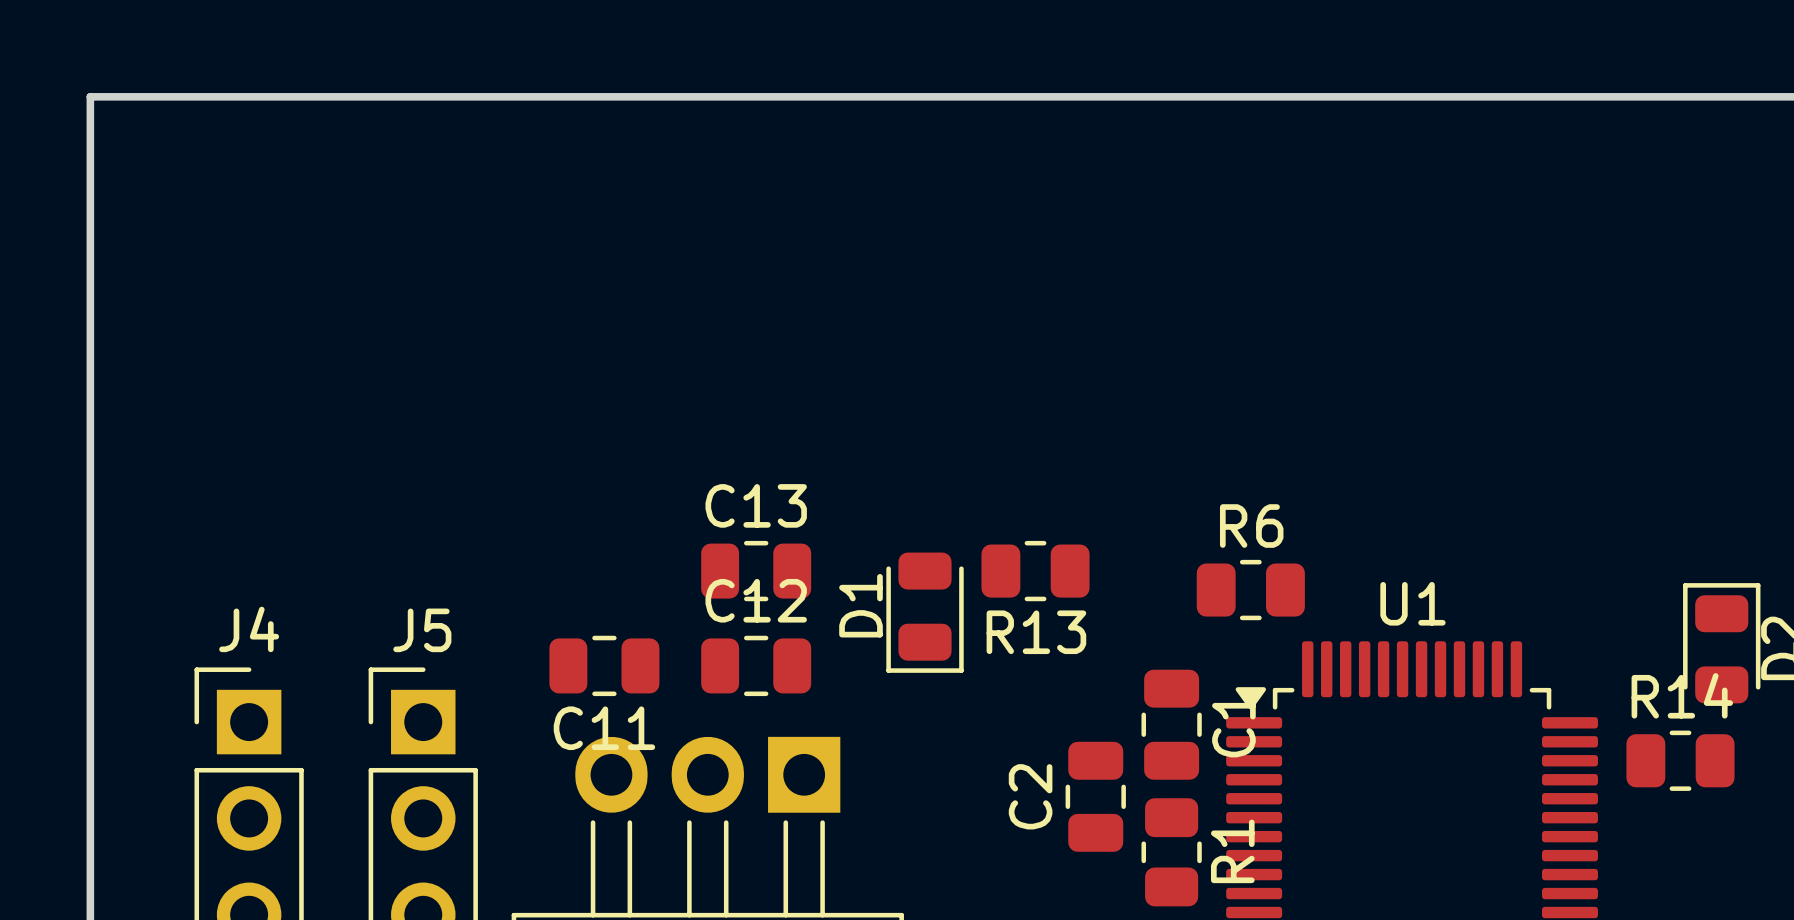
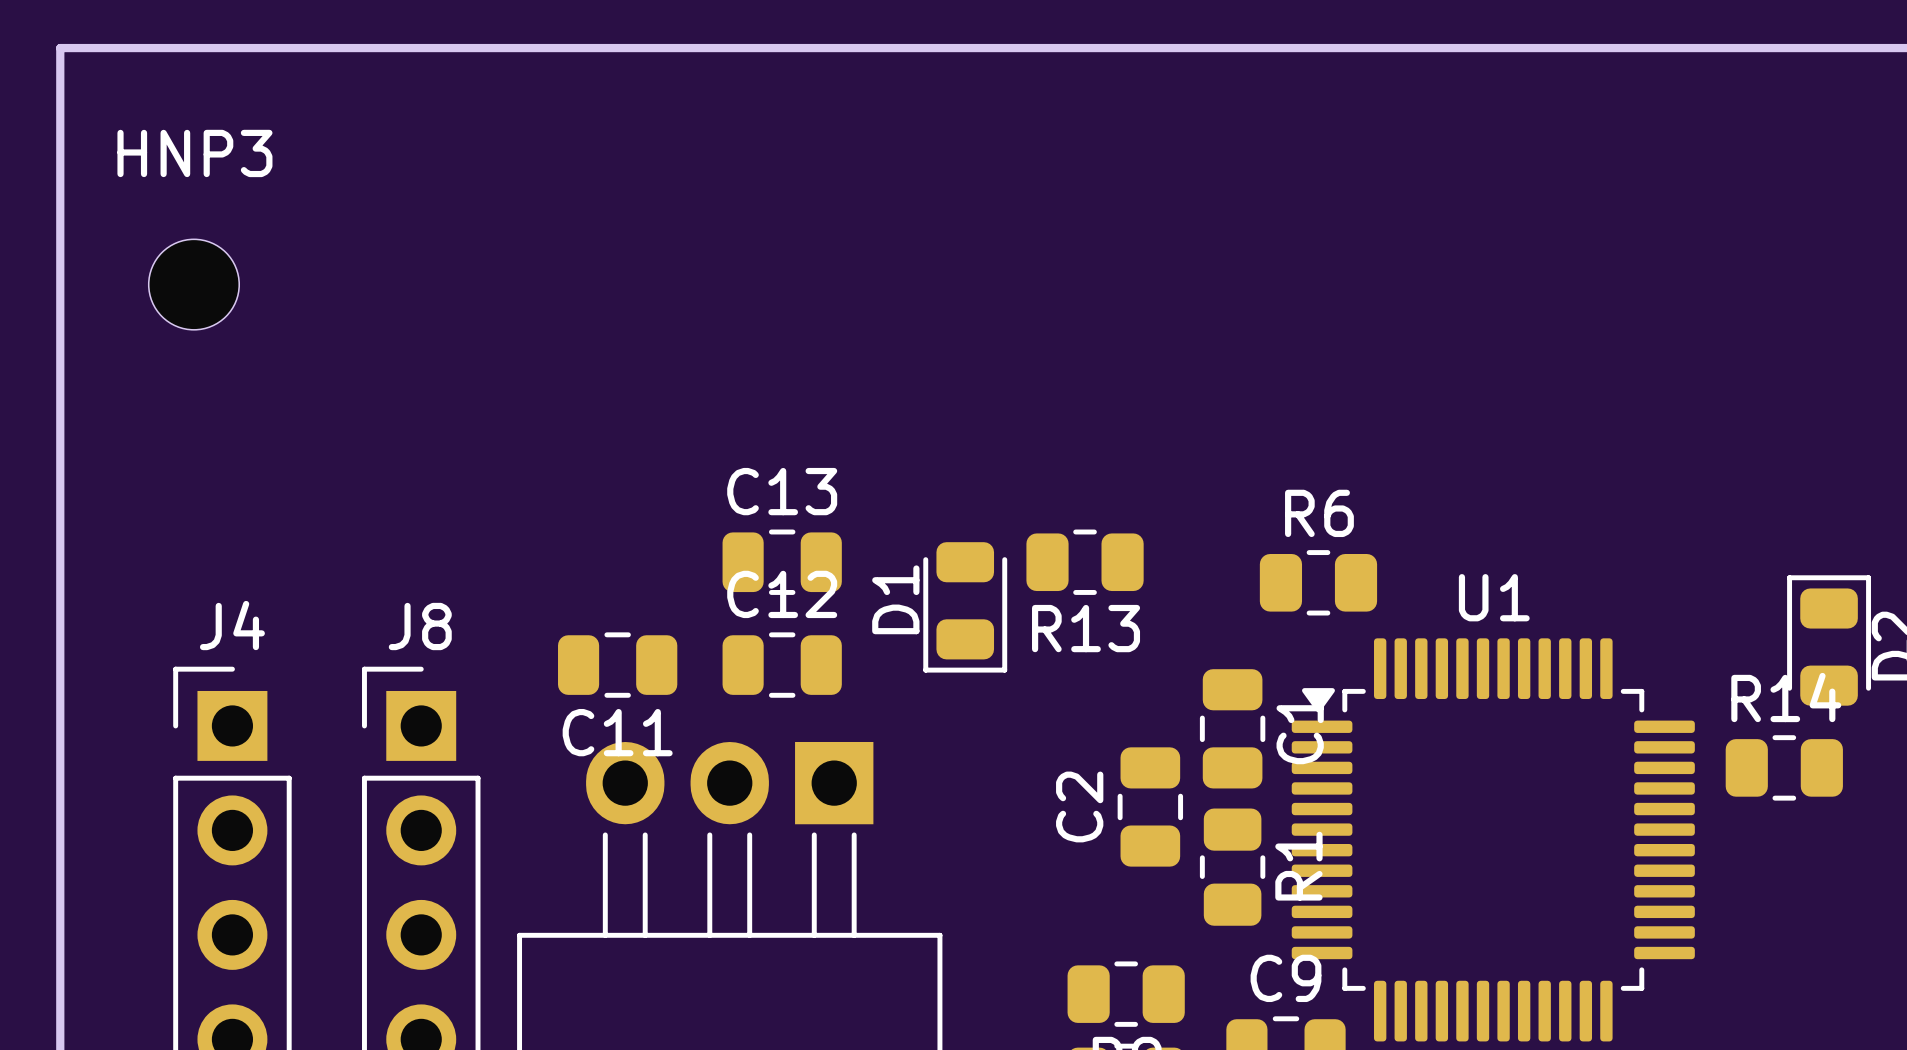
HNP3: none -> (193, 284)
J5 name: J5 (422, 630) -> J8 (420, 626)

